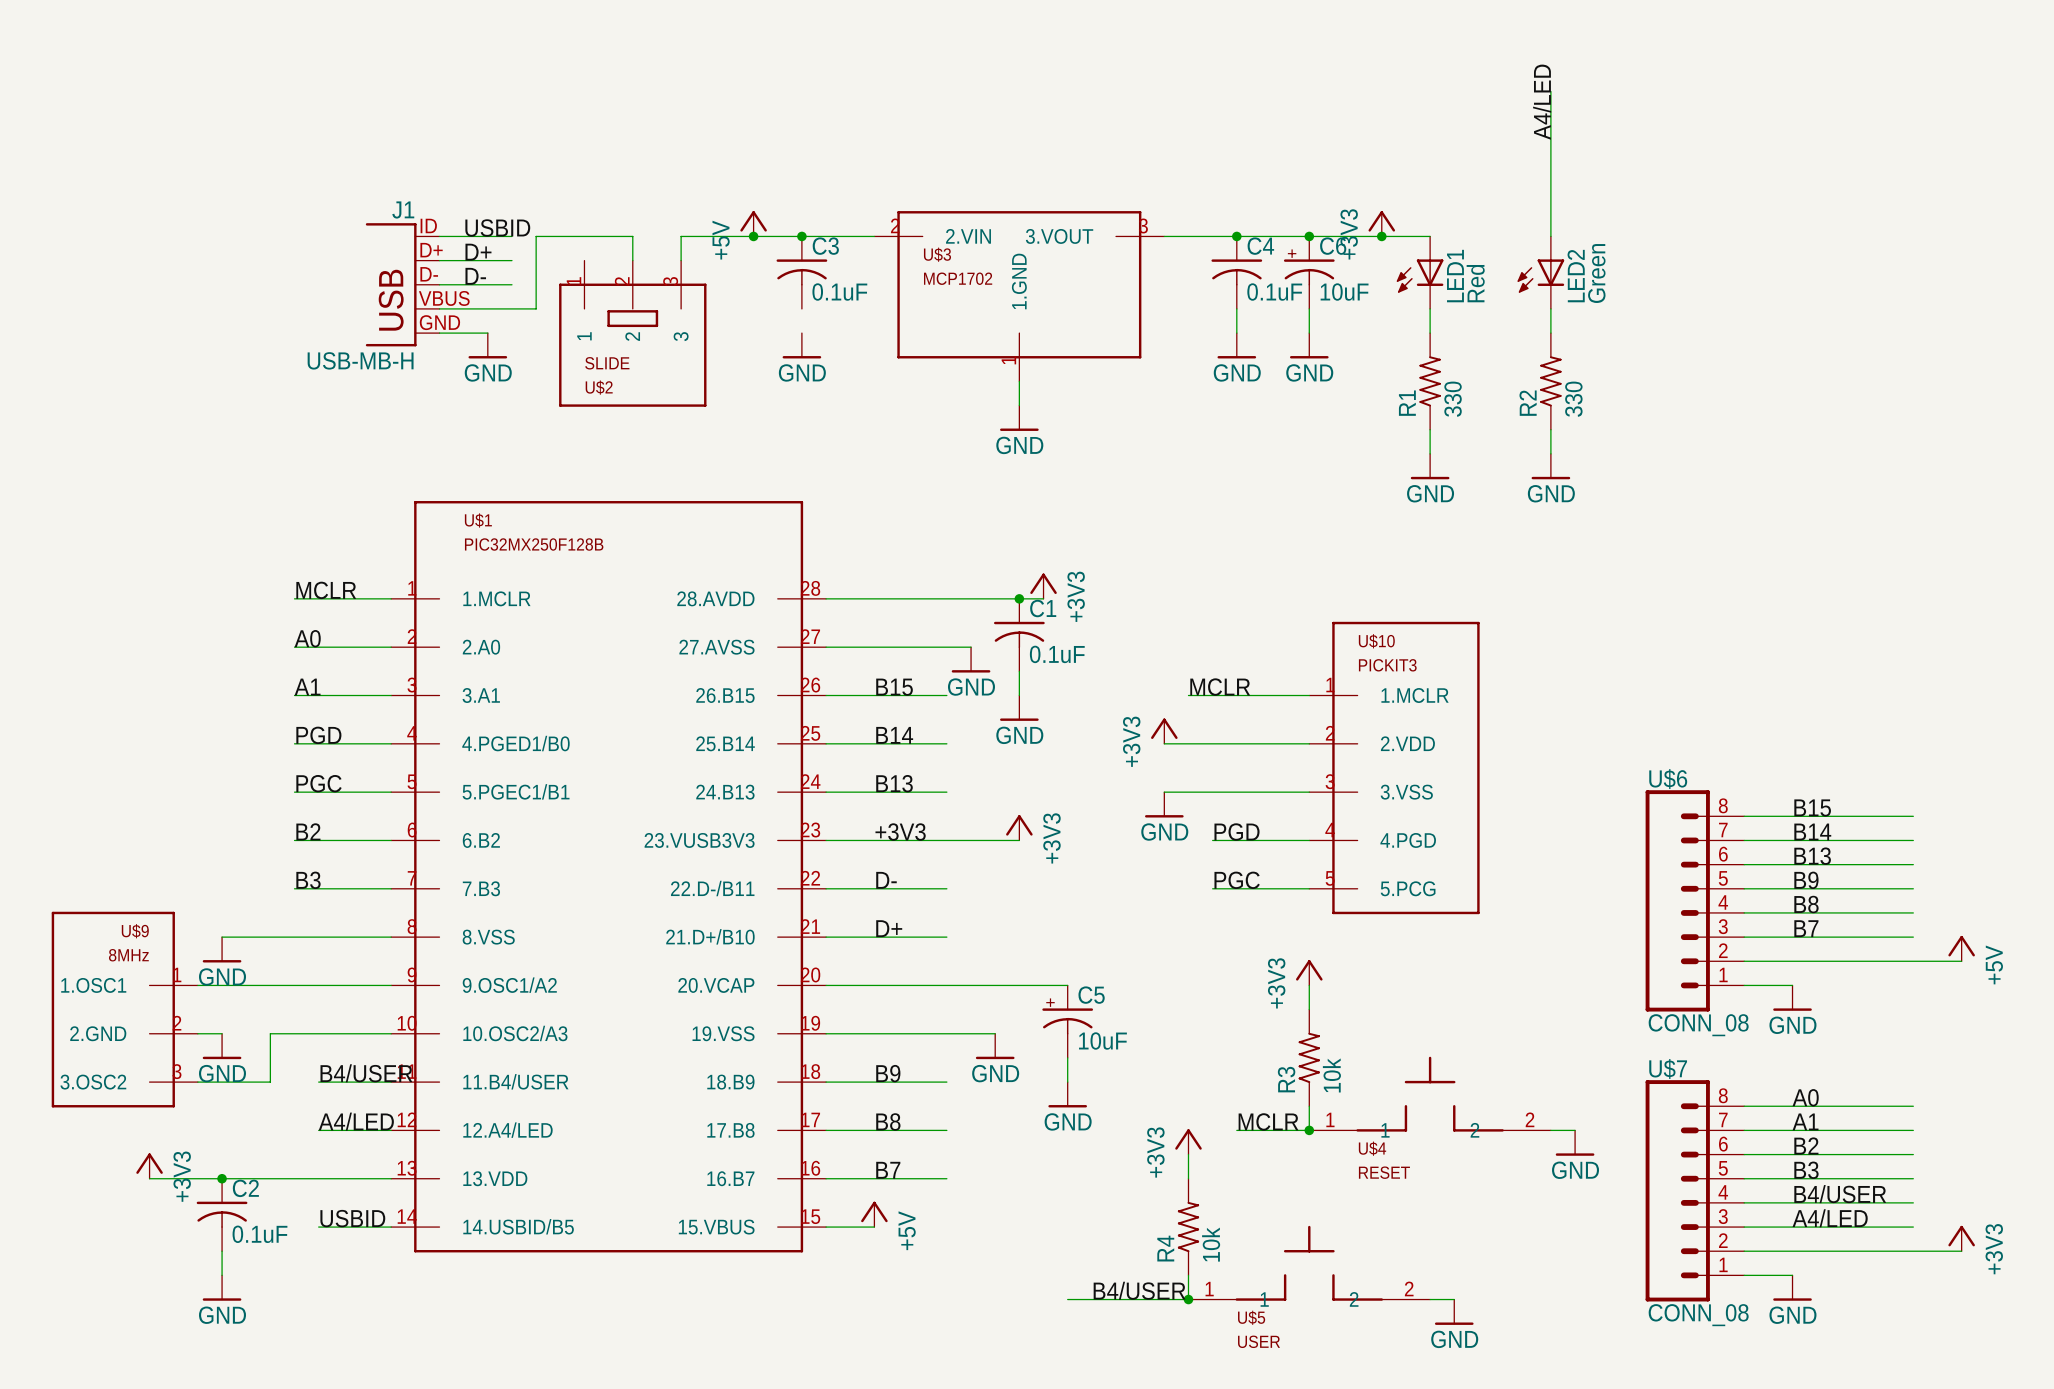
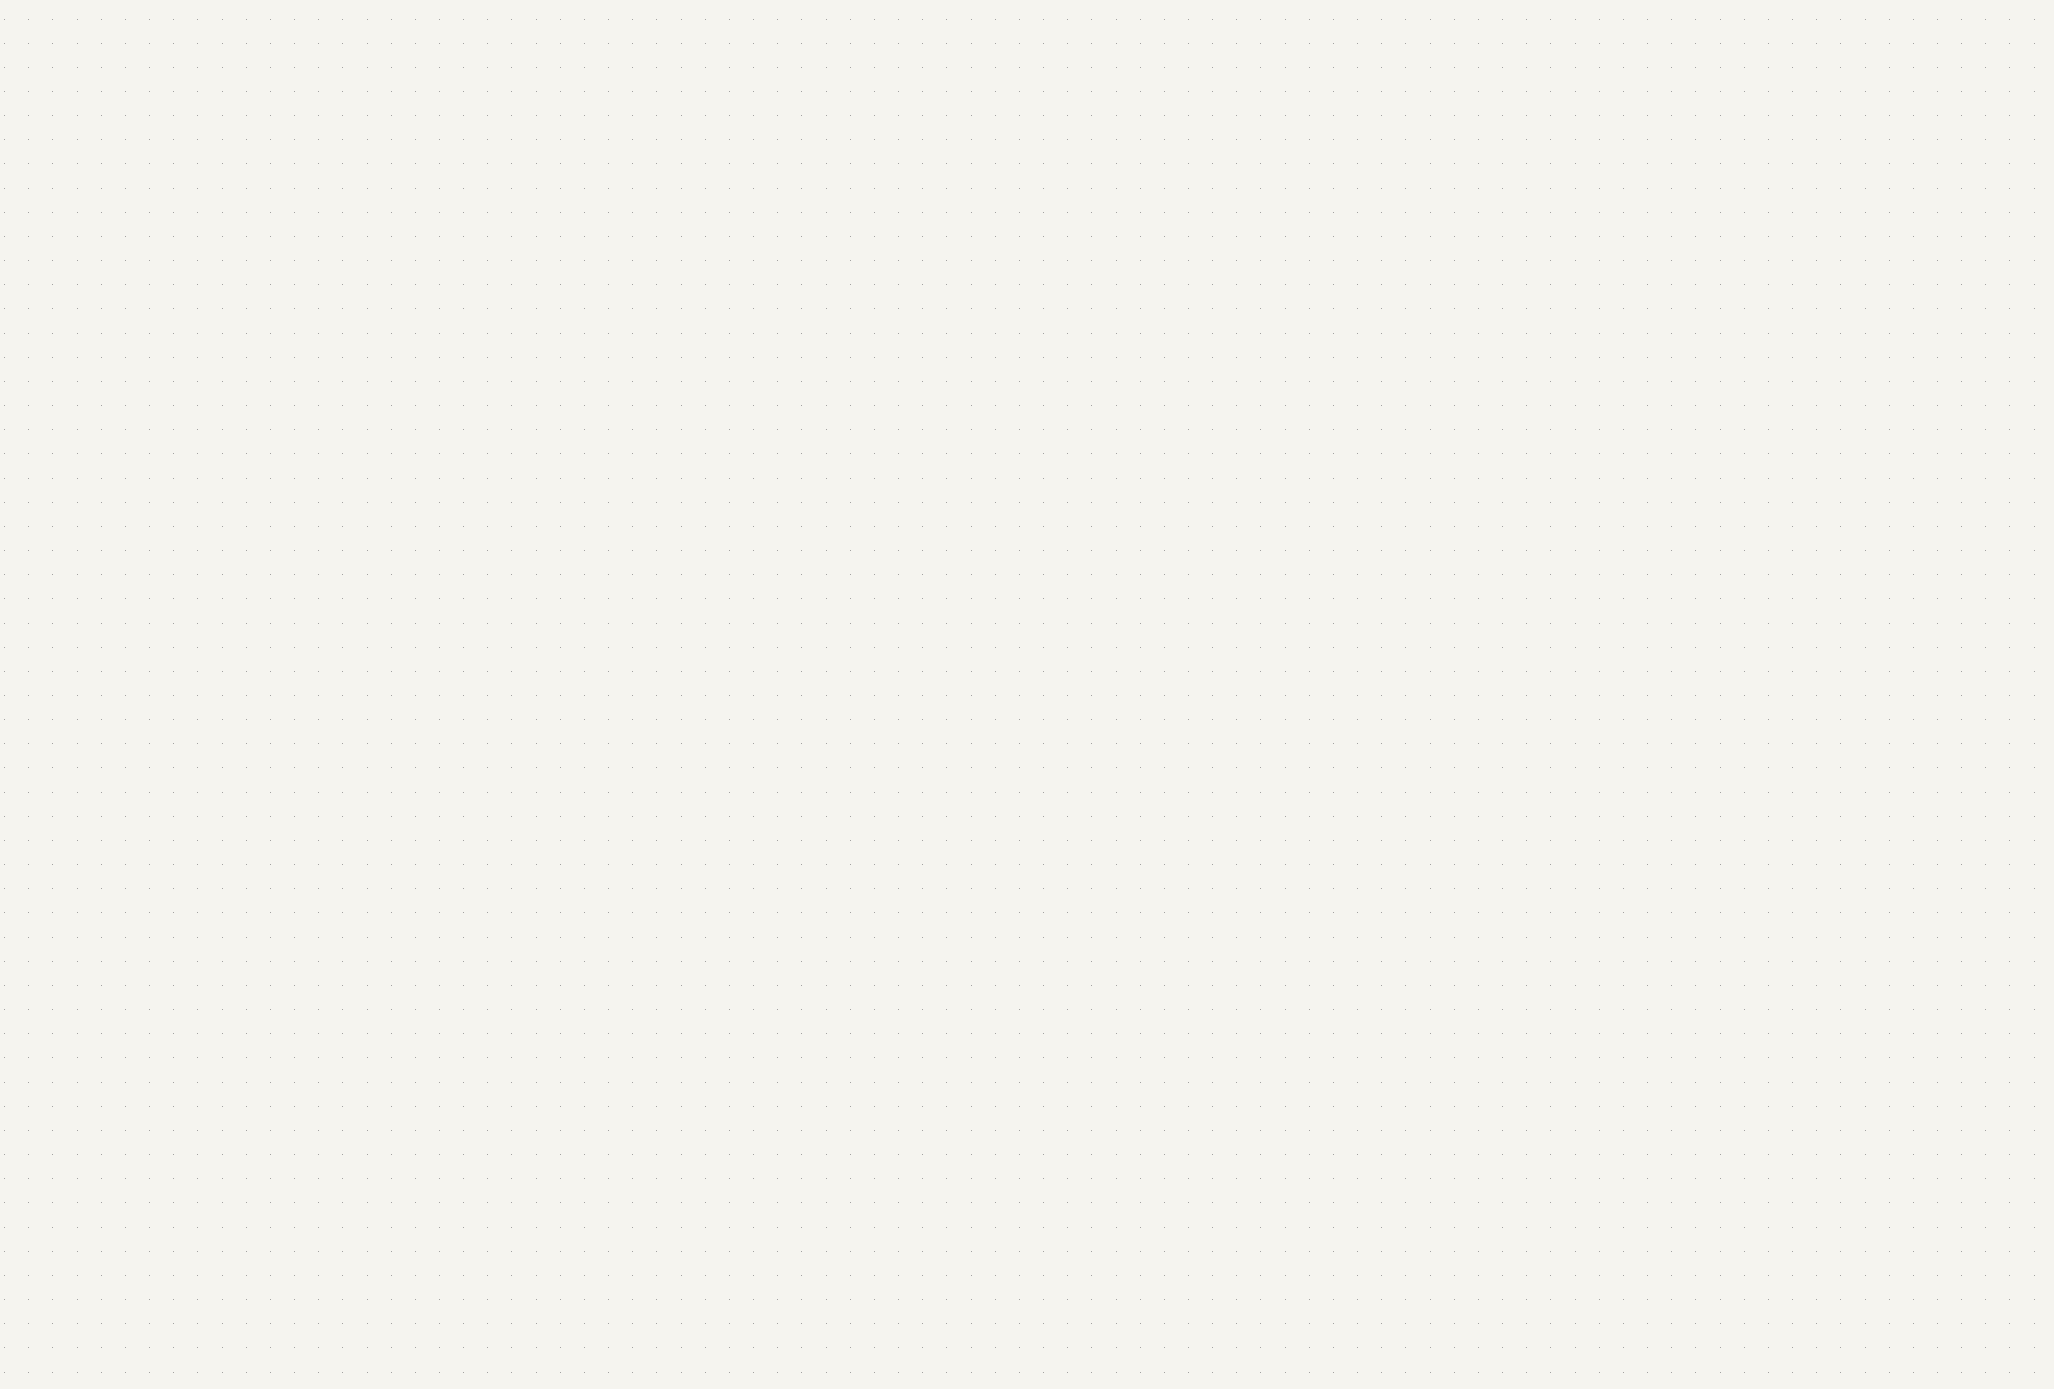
wire: (1550, 91) (1550, 236) -> none
label: A4/LED (1542, 102) -> none
power symbol: +5V (753, 223) -> none
power symbol: +3V3 (1381, 223) -> none
label: USBID (497, 227) -> none
wire: (439, 236) (511, 236) -> none
junction: (753, 236) -> none
junction: (801, 236) -> none
wire: (874, 236) (681, 236) (681, 260) -> none
wire: (1164, 236) (1430, 236) -> none
junction: (1236, 236) -> none
junction: (1309, 236) -> none
junction: (1381, 236) -> none
label: D+ (478, 252) -> none
wire: (439, 260) (511, 260) -> none
wire: (632, 260) (632, 236) (536, 236) (536, 308) (439, 308) -> none
C3: 0.1uF (801, 272) -> none
C4: 0.1uF (1236, 272) -> none
C6: 10uF (1309, 272) -> none
LED1: Red (1420, 272) -> none
LED2: Green (1540, 272) -> none
label: D- (475, 276) -> none
J1: USB-MB-H (402, 284) -> none
wire: (439, 284) (511, 284) -> none
U$3: MCP1702 (1019, 296) -> none
wire: (1236, 308) (1236, 333) -> none
wire: (1309, 308) (1309, 333) -> none
wire: (1430, 308) (1430, 333) -> none
wire: (1550, 308) (1550, 333) -> none
wire: (439, 333) (487, 333) -> none
U$2: SLIDE (632, 333) -> none
power symbol: GND (487, 345) -> none
power symbol: GND (801, 345) -> none
power symbol: GND (1236, 345) -> none
power symbol: GND (1309, 345) -> none
wire: (1019, 381) (1019, 405) -> none
R1: 330 (1430, 381) -> none
R2: 330 (1550, 381) -> none
power symbol: GND (1019, 418) -> none
wire: (1430, 429) (1430, 453) -> none
wire: (1550, 429) (1550, 453) -> none
power symbol: GND (1430, 466) -> none
power symbol: GND (1550, 466) -> none
power symbol: +3V3 (1043, 586) -> none
label: MCLR (326, 590) -> none
wire: (294, 598) (391, 598) -> none
wire: (826, 598) (1043, 598) -> none
junction: (1019, 598) -> none
C1: 0.1uF (1019, 635) -> none
label: A0 (307, 638) -> none
wire: (294, 647) (391, 647) -> none
wire: (826, 647) (971, 647) -> none
power symbol: GND (971, 659) -> none
wire: (1019, 671) (1019, 695) -> none
label: A1 (307, 687) -> none
label: B15 (894, 687) -> none
label: MCLR (1220, 687) -> none
wire: (294, 695) (391, 695) -> none
wire: (826, 695) (946, 695) -> none
wire: (1188, 695) (1309, 695) -> none
power symbol: GND (1019, 708) -> none
power symbol: +3V3 (1164, 731) -> none
label: PGD (318, 735) -> none
label: B14 (894, 735) -> none
wire: (294, 743) (391, 743) -> none
wire: (826, 743) (946, 743) -> none
wire: (1164, 743) (1309, 743) -> none
U$10: PICKIT3 (1394, 767) -> none
label: PGC (318, 783) -> none
label: B13 (894, 783) -> none
wire: (294, 792) (391, 792) -> none
wire: (826, 792) (946, 792) -> none
wire: (1164, 792) (1309, 792) -> none
power symbol: GND (1164, 804) -> none
label: B15 (1812, 807) -> none
wire: (1744, 816) (1913, 816) -> none
power symbol: +3V3 (1019, 827) -> none
label: B2 (308, 831) -> none
label: +3V3 (900, 832) -> none
label: PGD (1237, 832) -> none
label: B14 (1812, 832) -> none
wire: (294, 840) (391, 840) -> none
wire: (826, 840) (1019, 840) -> none
wire: (1212, 840) (1309, 840) -> none
wire: (1744, 840) (1913, 840) -> none
label: B13 (1812, 856) -> none
wire: (1744, 864) (1913, 864) -> none
U$1: PIC32MX250F128B (608, 876) -> none
label: B3 (308, 880) -> none
label: D- (886, 880) -> none
label: PGC (1237, 880) -> none
label: B9 (1806, 880) -> none
wire: (294, 888) (391, 888) -> none
wire: (826, 888) (946, 888) -> none
wire: (1212, 888) (1309, 888) -> none
wire: (1744, 888) (1913, 888) -> none
U$6: CONN_08 (1694, 900) -> none
label: B8 (1806, 904) -> none
wire: (1744, 912) (1913, 912) -> none
label: D+ (889, 928) -> none
label: B7 (1806, 928) -> none
wire: (222, 937) (391, 937) -> none
wire: (826, 937) (946, 937) -> none
wire: (1744, 937) (1913, 937) -> none
power symbol: +5V (1961, 948) -> none
power symbol: GND (222, 949) -> none
wire: (1744, 961) (1961, 961) -> none
power symbol: +3V3 (1309, 972) -> none
wire: (197, 985) (391, 985) -> none
wire: (826, 985) (1067, 985) -> none
wire: (1309, 985) (1309, 1009) -> none
wire: (1744, 985) (1792, 985) -> none
power symbol: GND (1792, 998) -> none
U$9: 8MHz (124, 1009) -> none
C5: 10uF (1067, 1021) -> none
wire: (197, 1033) (222, 1033) -> none
wire: (391, 1033) (270, 1033) (270, 1082) (197, 1082) -> none
wire: (826, 1033) (995, 1033) -> none
power symbol: GND (222, 1046) -> none
power symbol: GND (995, 1046) -> none
wire: (1067, 1057) (1067, 1082) -> none
R3: 10k (1309, 1057) -> none
label: B4/USER (366, 1073) -> none
label: B9 (888, 1073) -> none
wire: (318, 1082) (391, 1082) -> none
wire: (826, 1082) (946, 1082) -> none
power symbol: GND (1067, 1094) -> none
U$4: RESET (1430, 1094) -> none
label: A0 (1805, 1097) -> none
wire: (1309, 1106) (1309, 1130) (1236, 1130) -> none
wire: (1744, 1106) (1913, 1106) -> none
label: A4/LED (356, 1121) -> none
label: B8 (888, 1121) -> none
label: MCLR (1268, 1121) -> none
label: A1 (1805, 1121) -> none
wire: (318, 1130) (391, 1130) -> none
wire: (826, 1130) (946, 1130) -> none
junction: (1309, 1130) -> none
wire: (1550, 1130) (1575, 1130) -> none
wire: (1744, 1130) (1913, 1130) -> none
power symbol: +3V3 (1188, 1141) -> none
power symbol: GND (1575, 1143) -> none
label: B2 (1806, 1145) -> none
wire: (1188, 1154) (1188, 1178) -> none
wire: (1744, 1154) (1913, 1154) -> none
power symbol: +3V3 (149, 1166) -> none
label: B7 (888, 1170) -> none
label: B3 (1806, 1170) -> none
wire: (149, 1178) (391, 1178) -> none
junction: (222, 1178) -> none
wire: (826, 1178) (946, 1178) -> none
wire: (1744, 1178) (1913, 1178) -> none
U$7: CONN_08 (1694, 1190) -> none
label: B4/USER (1840, 1194) -> none
wire: (1744, 1202) (1913, 1202) -> none
C2: 0.1uF (222, 1214) -> none
power symbol: +5V (874, 1214) -> none
label: USBID (352, 1218) -> none
label: A4/LED (1830, 1218) -> none
wire: (318, 1227) (391, 1227) -> none
wire: (826, 1227) (874, 1227) -> none
R4: 10k (1188, 1227) -> none
wire: (1744, 1227) (1913, 1227) -> none
power symbol: +3V3 (1961, 1238) -> none
wire: (222, 1251) (222, 1275) -> none
wire: (1744, 1251) (1961, 1251) -> none
U$5: USER (1309, 1263) -> none
wire: (1188, 1275) (1188, 1299) (1067, 1299) -> none
wire: (1744, 1275) (1792, 1275) -> none
power symbol: GND (222, 1288) -> none
power symbol: GND (1792, 1288) -> none
label: B4/USER (1139, 1290) -> none
junction: (1188, 1299) -> none
wire: (1430, 1299) (1454, 1299) -> none
power symbol: GND (1454, 1312) -> none

